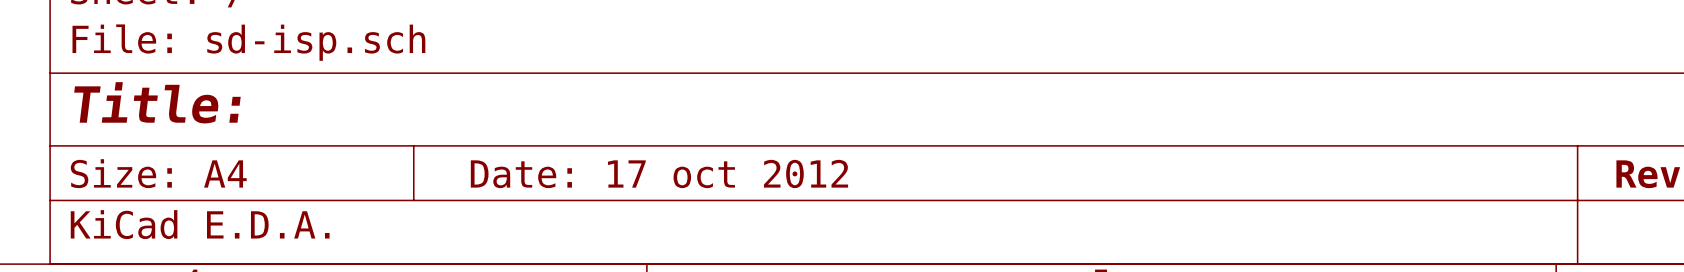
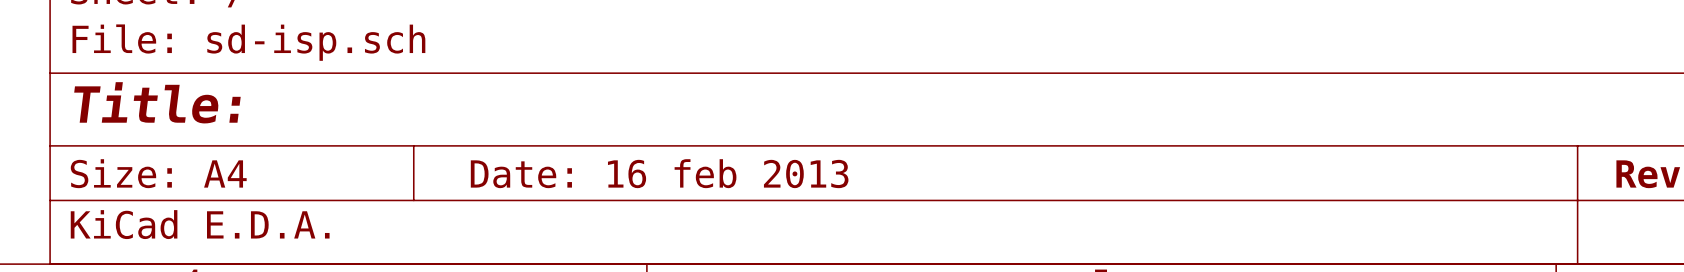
title block: Date: 17 oct 2012 (659, 174) -> Date: 16 feb 2013 (659, 173)

